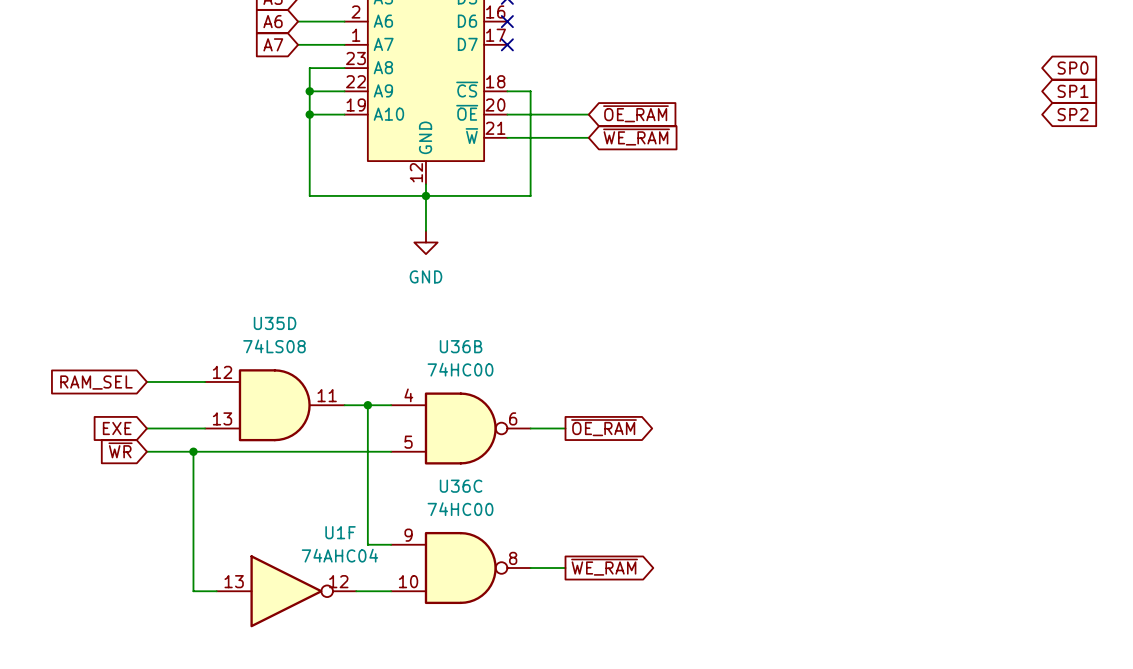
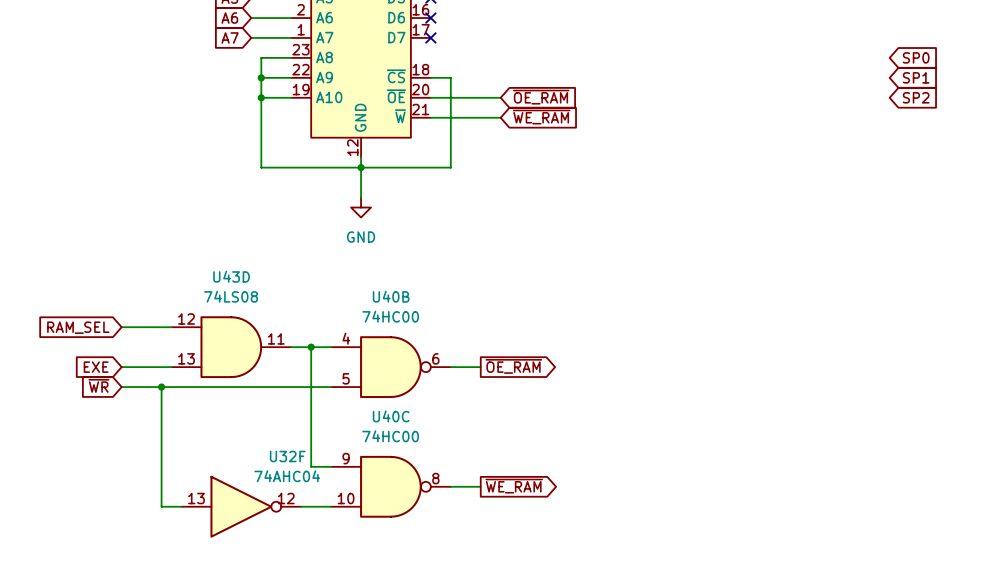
U35D name: U35D (275, 323) -> U43D (231, 276)
U36B name: U36B (461, 346) -> U40B (391, 296)
U36C name: U36C (461, 486) -> U40C (391, 416)
U1F name: U1F (340, 532) -> U32F (287, 456)

